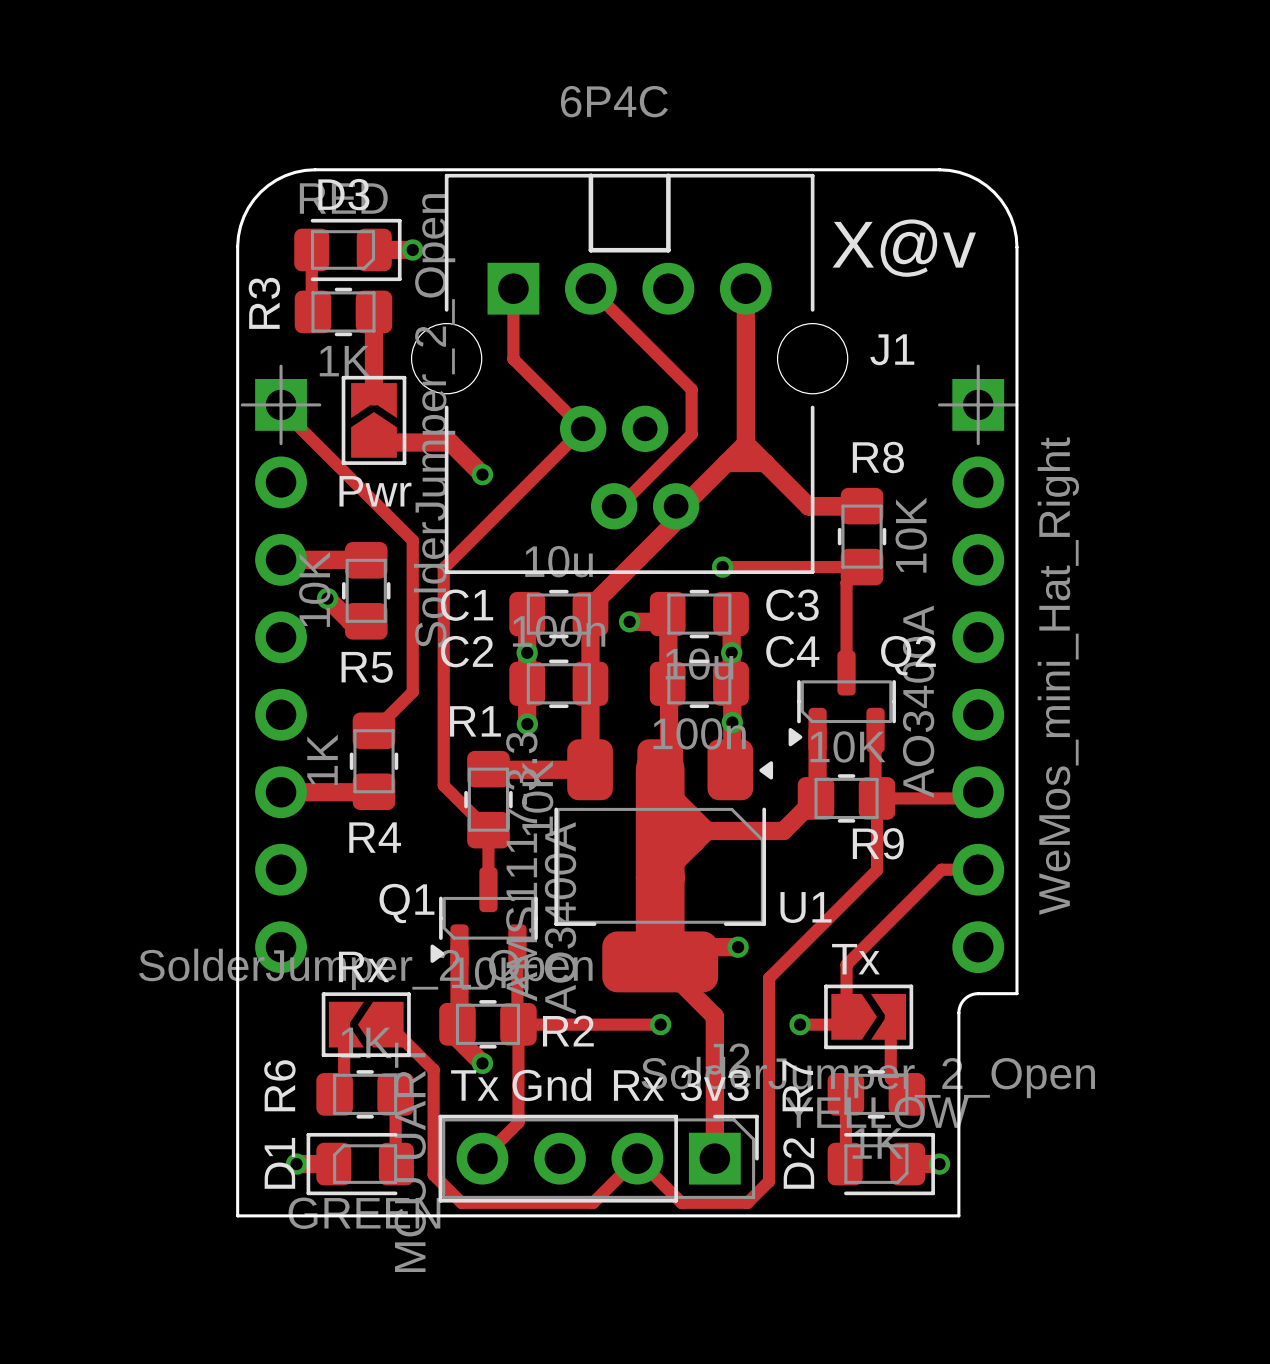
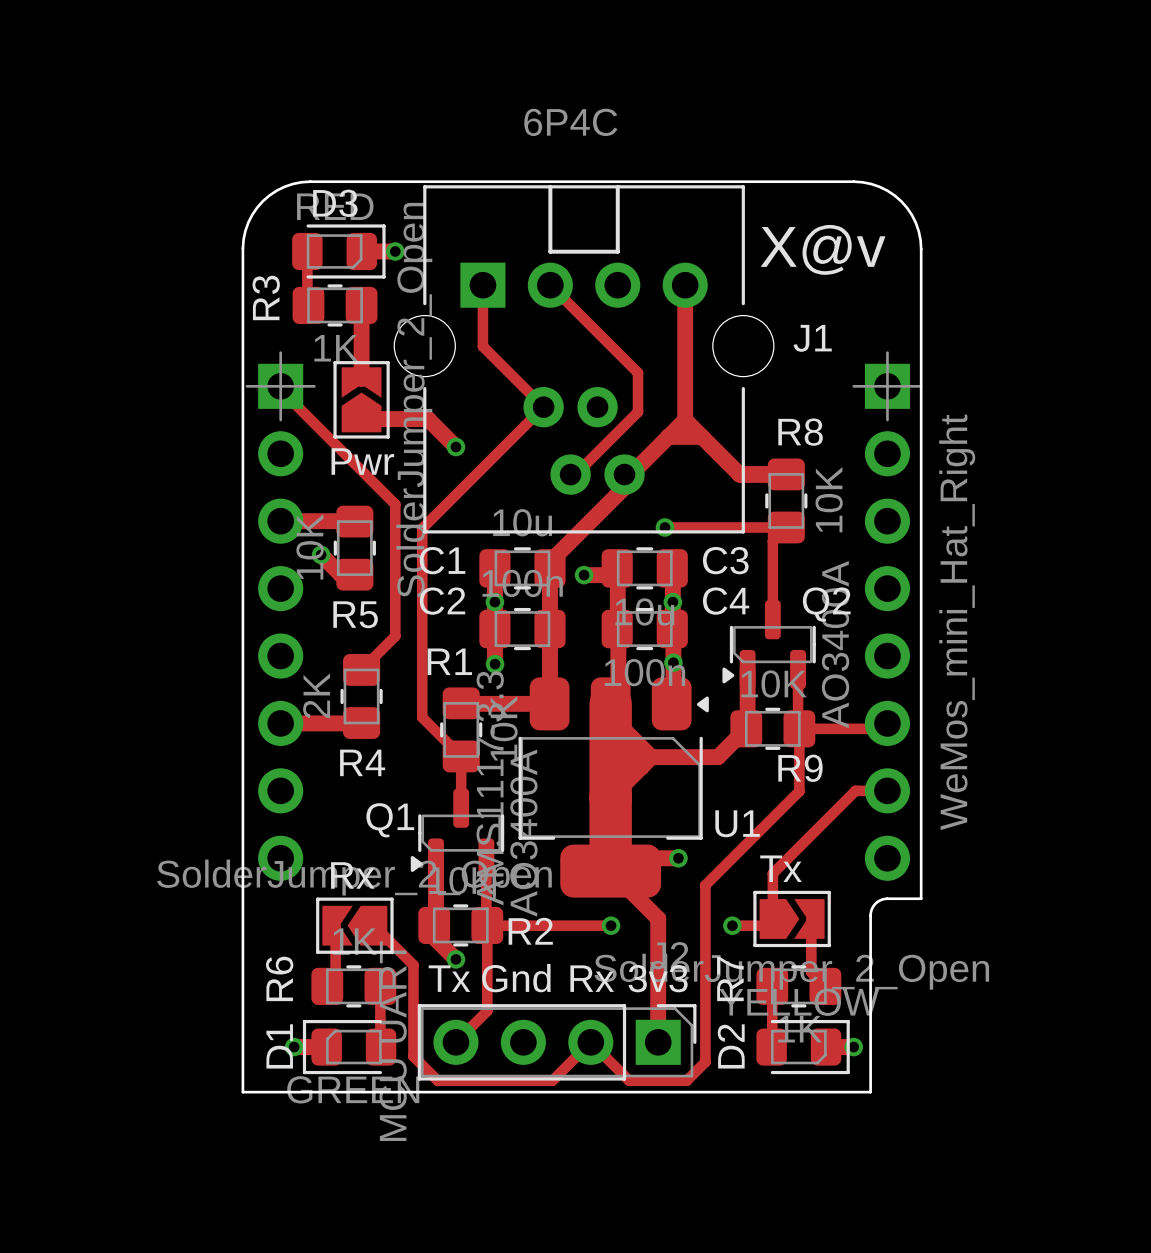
R4 value: 1K (322, 759) -> 2K (316, 695)

